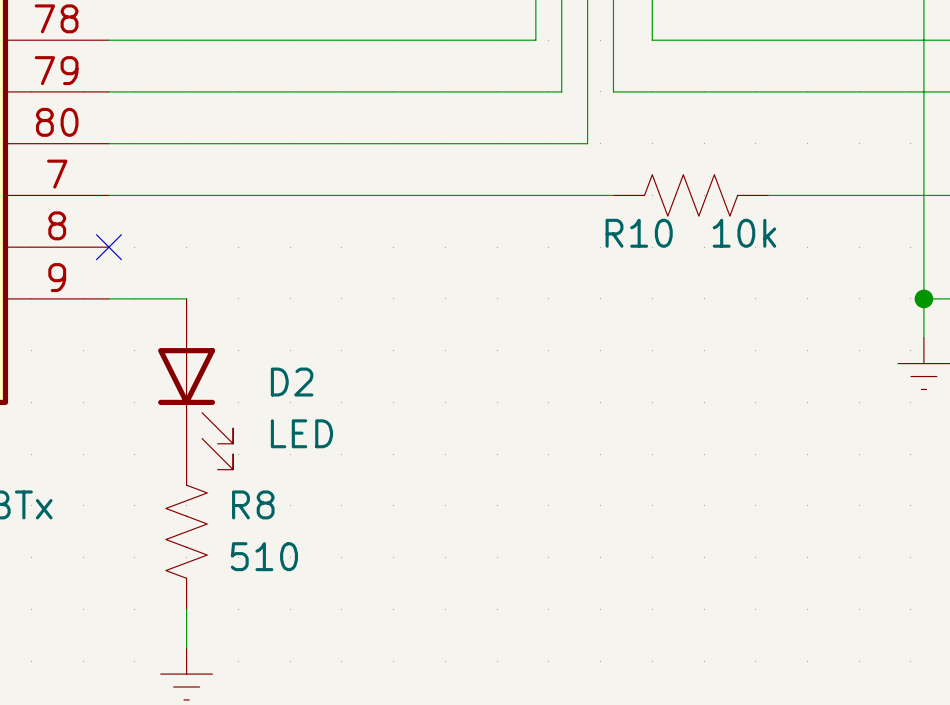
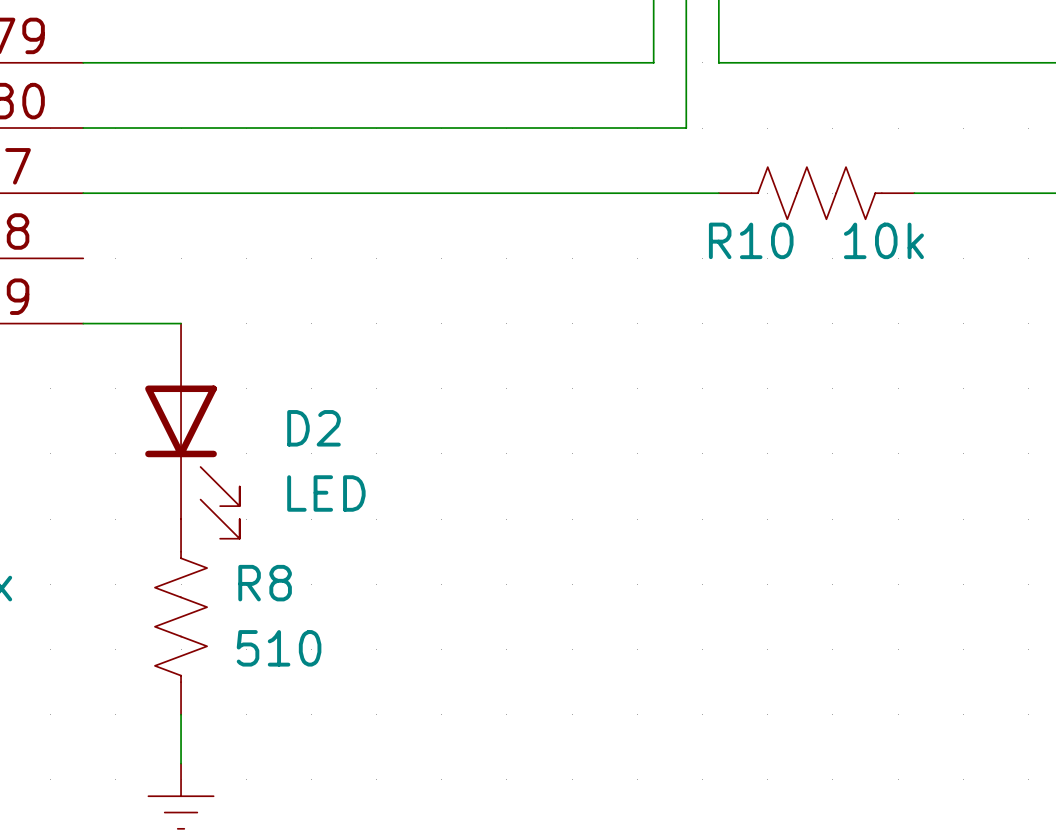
no-connect mark: (108, 247) -> none

